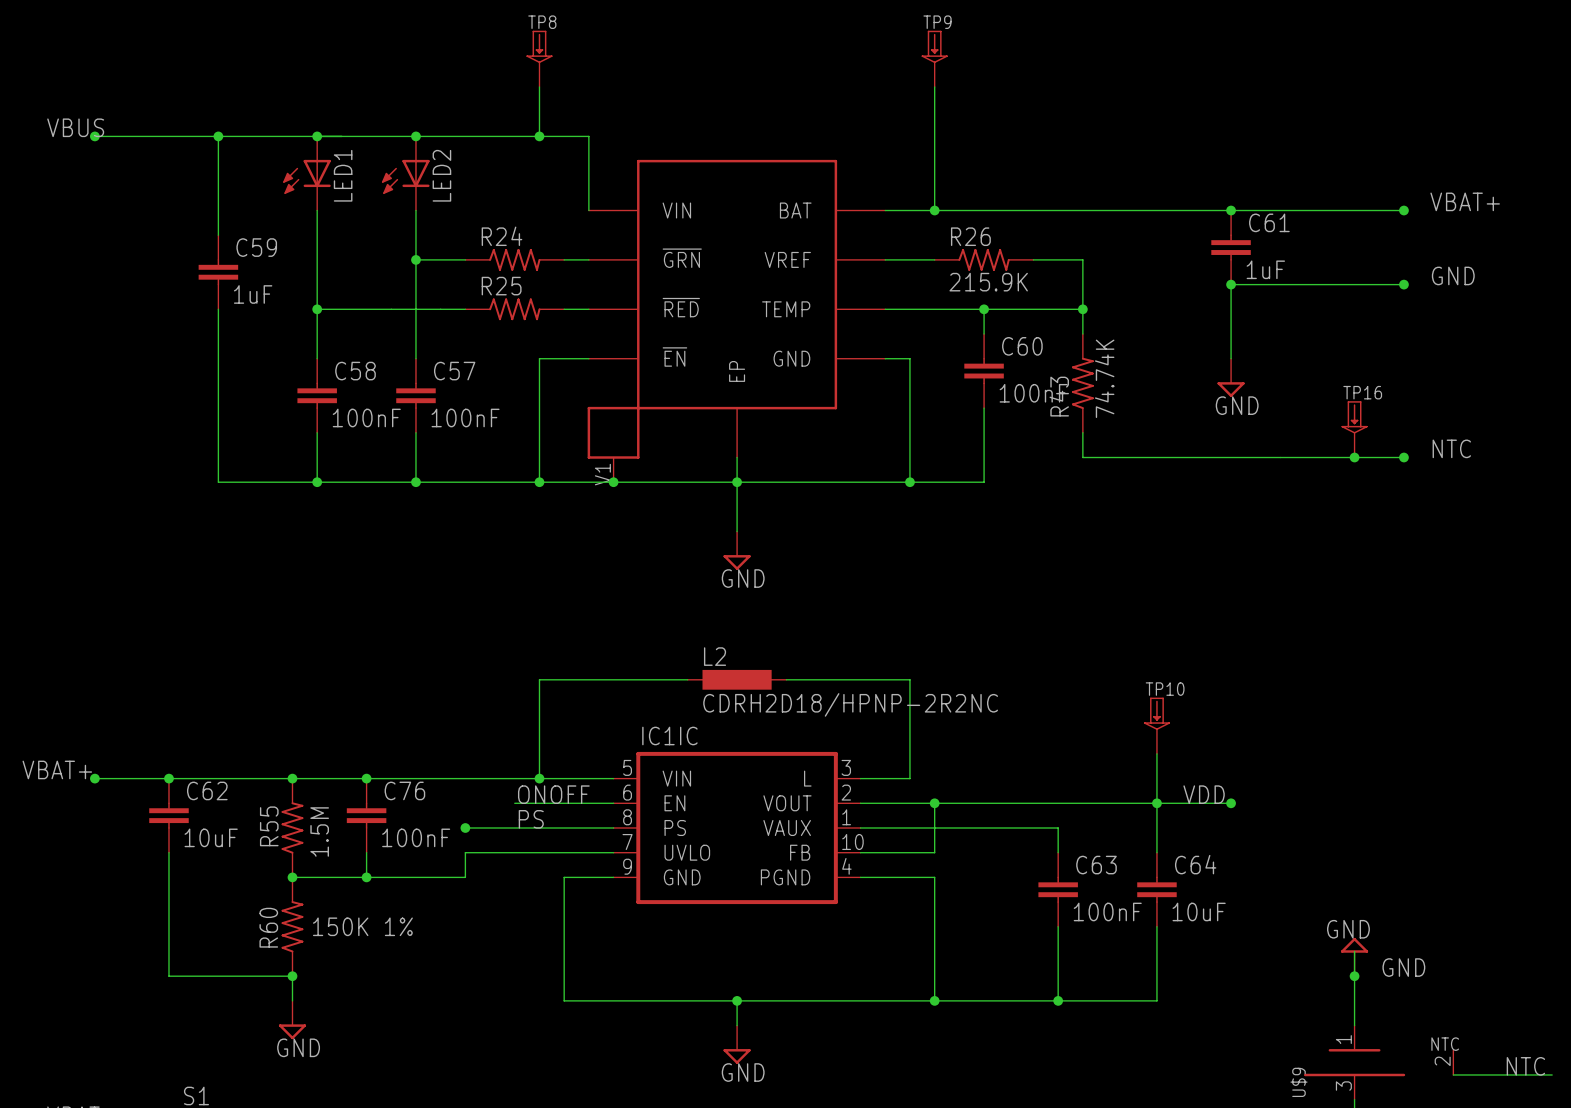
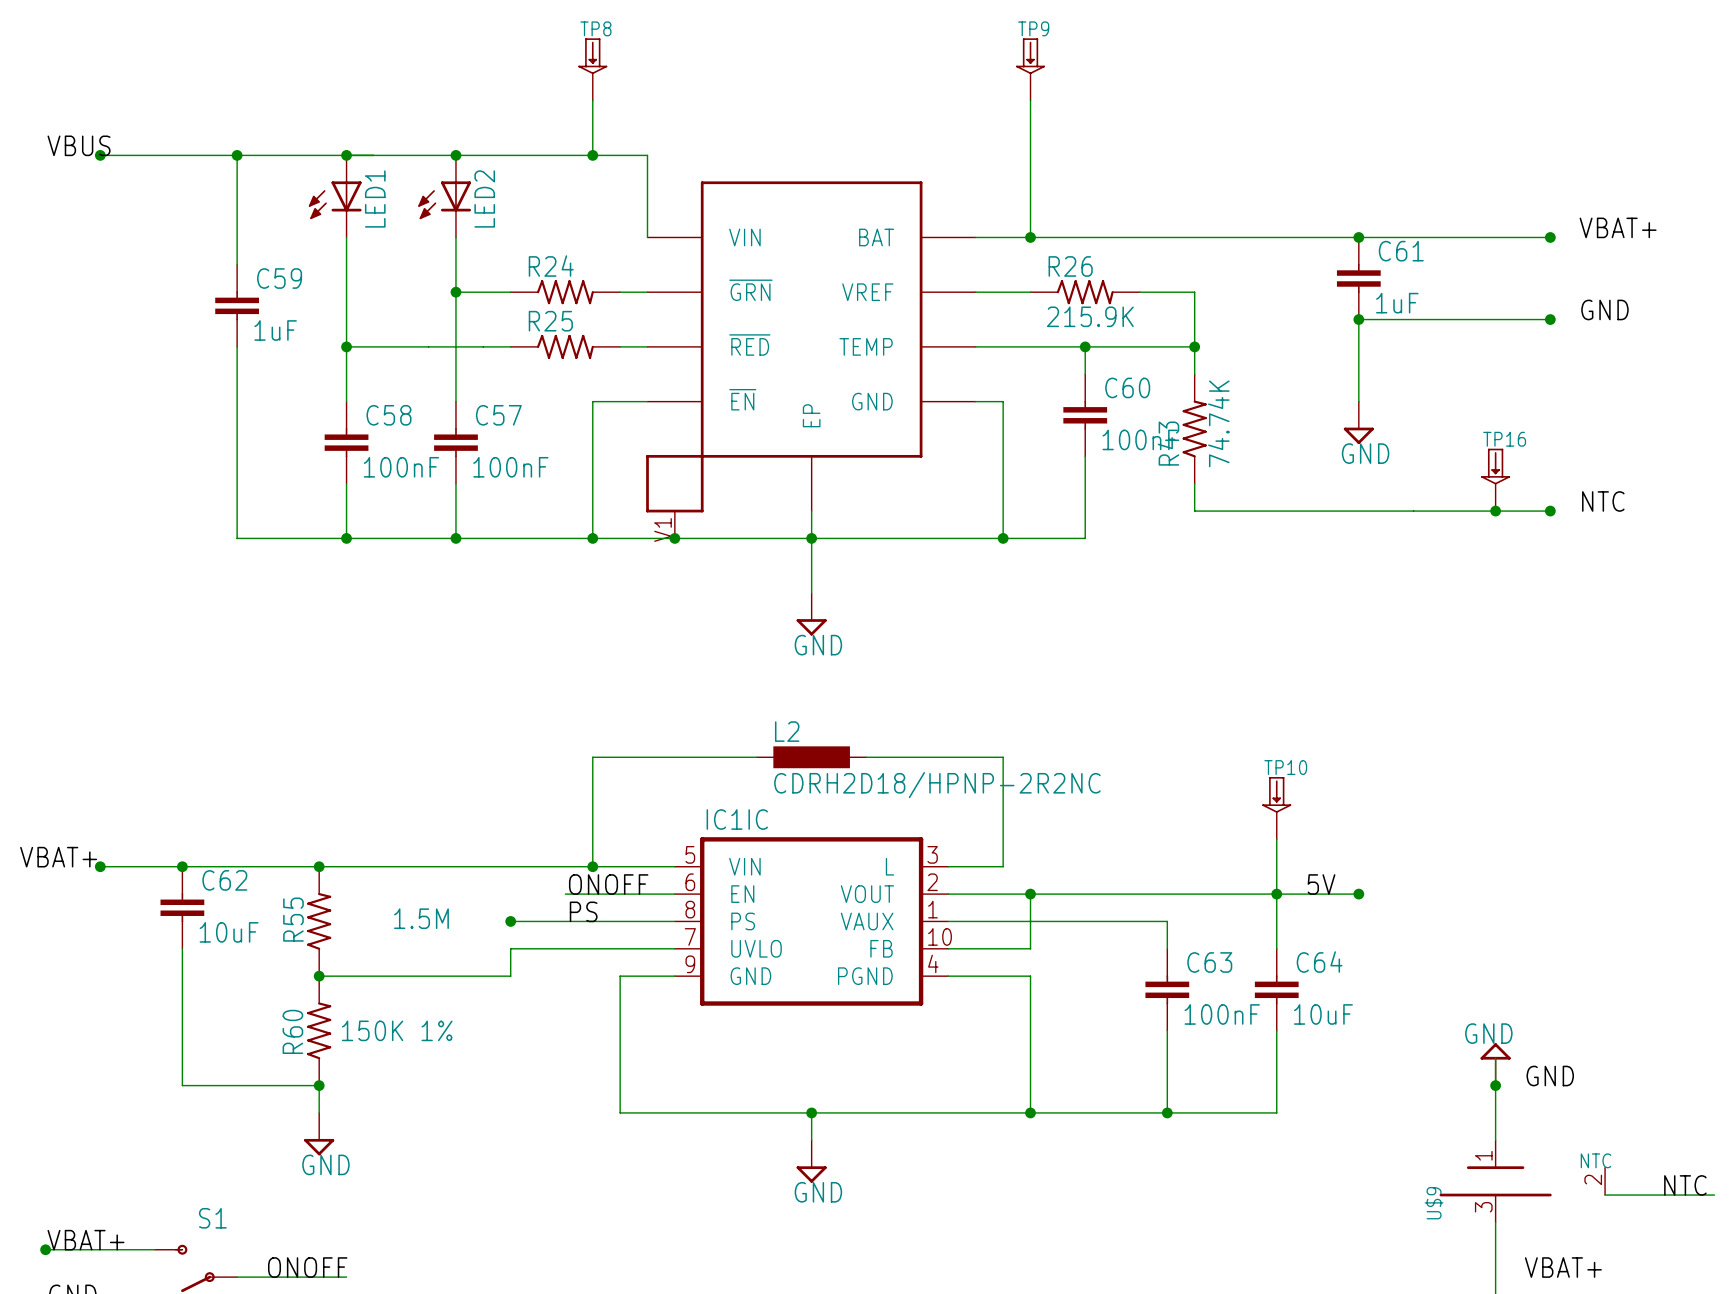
junction: (366, 778) -> none
label: VDD (1204, 794) -> 5V (1321, 884)
C76: 100nF (366, 815) -> none
R55 value rotation: 0° (319, 831) -> 90° clockwise (421, 918)
wire: (366, 852) (366, 877) -> none
junction: (366, 877) -> none

